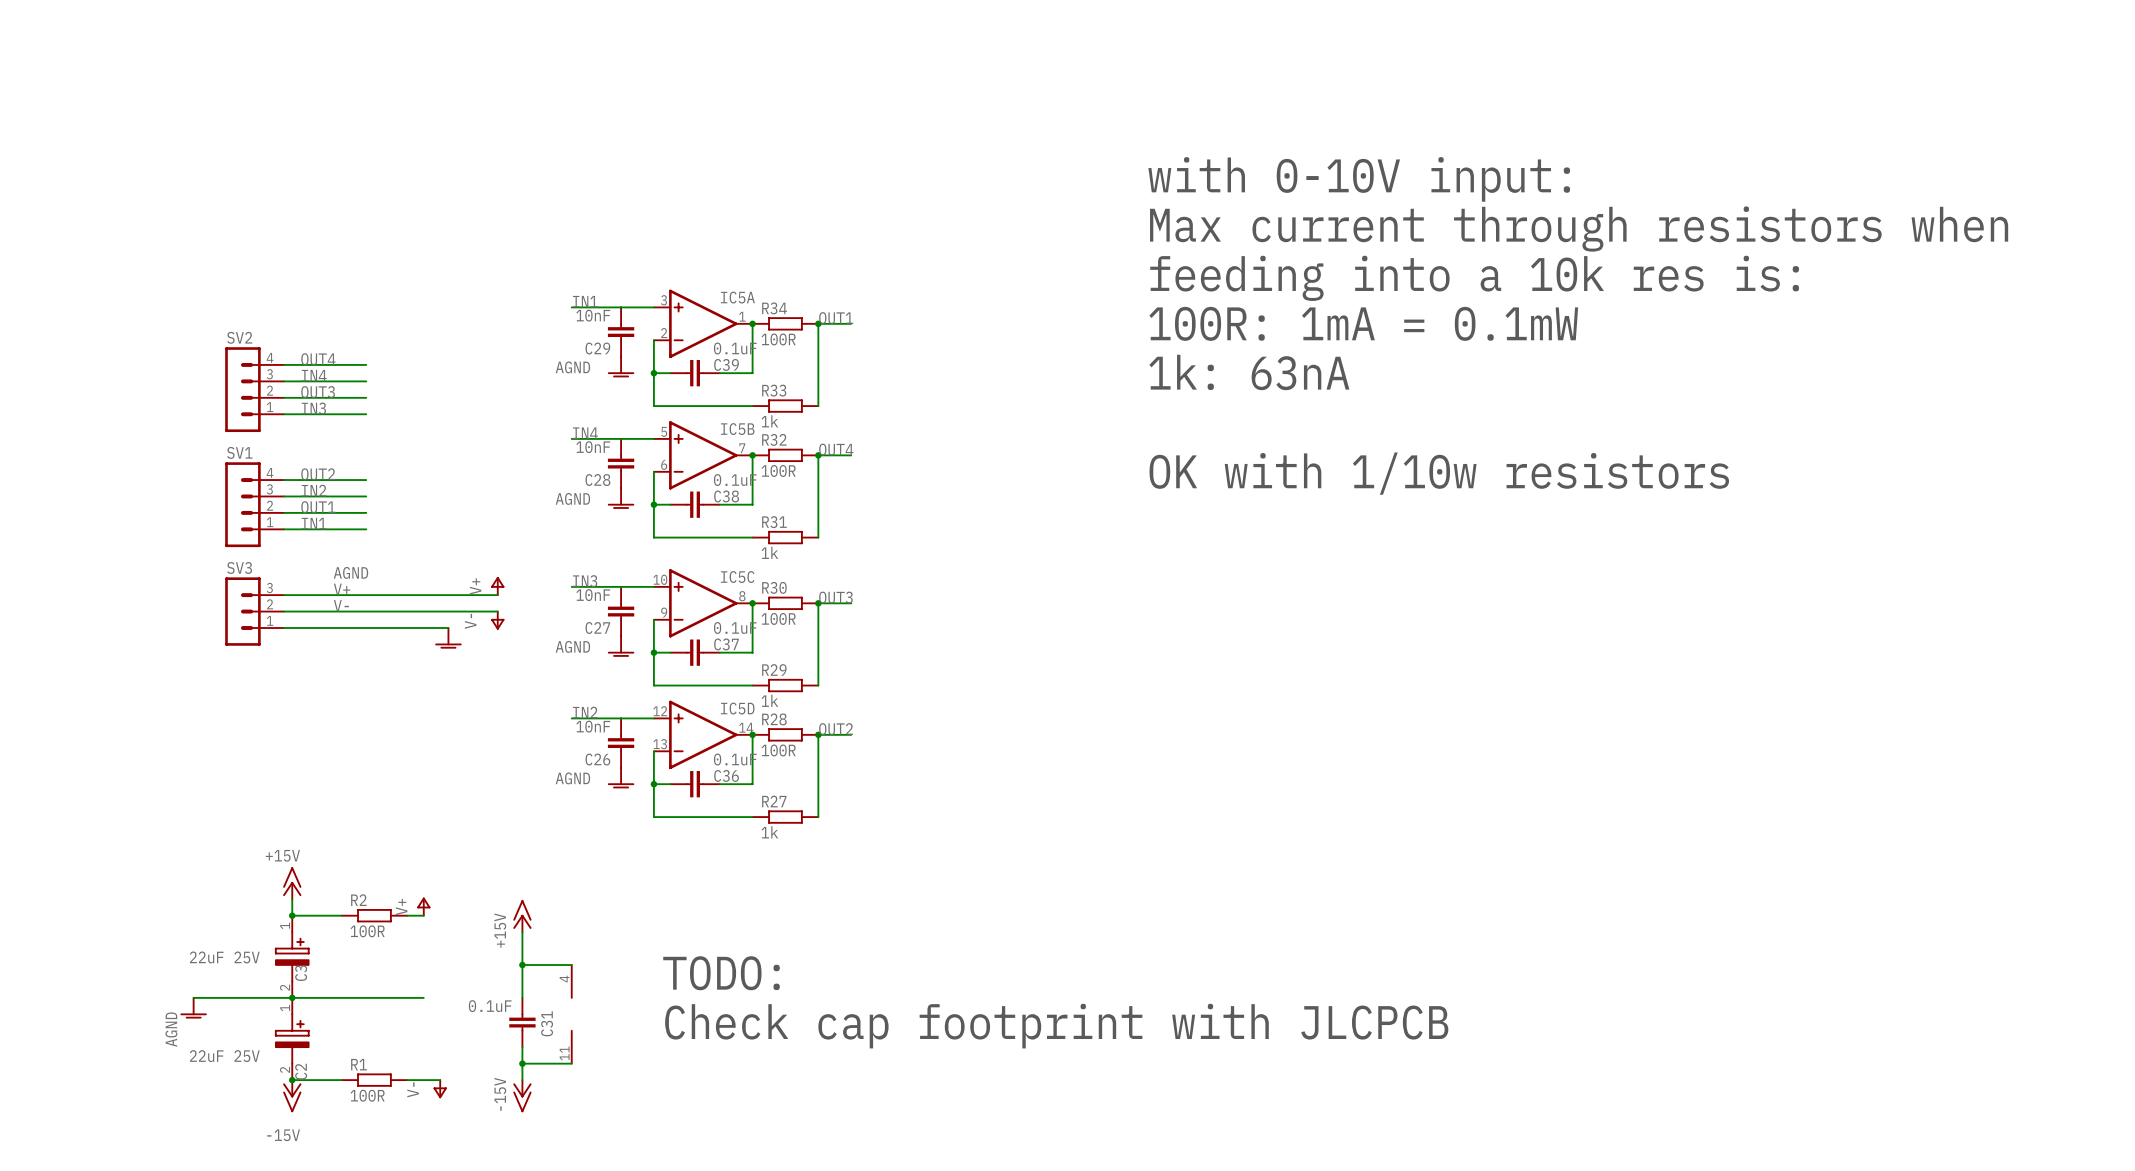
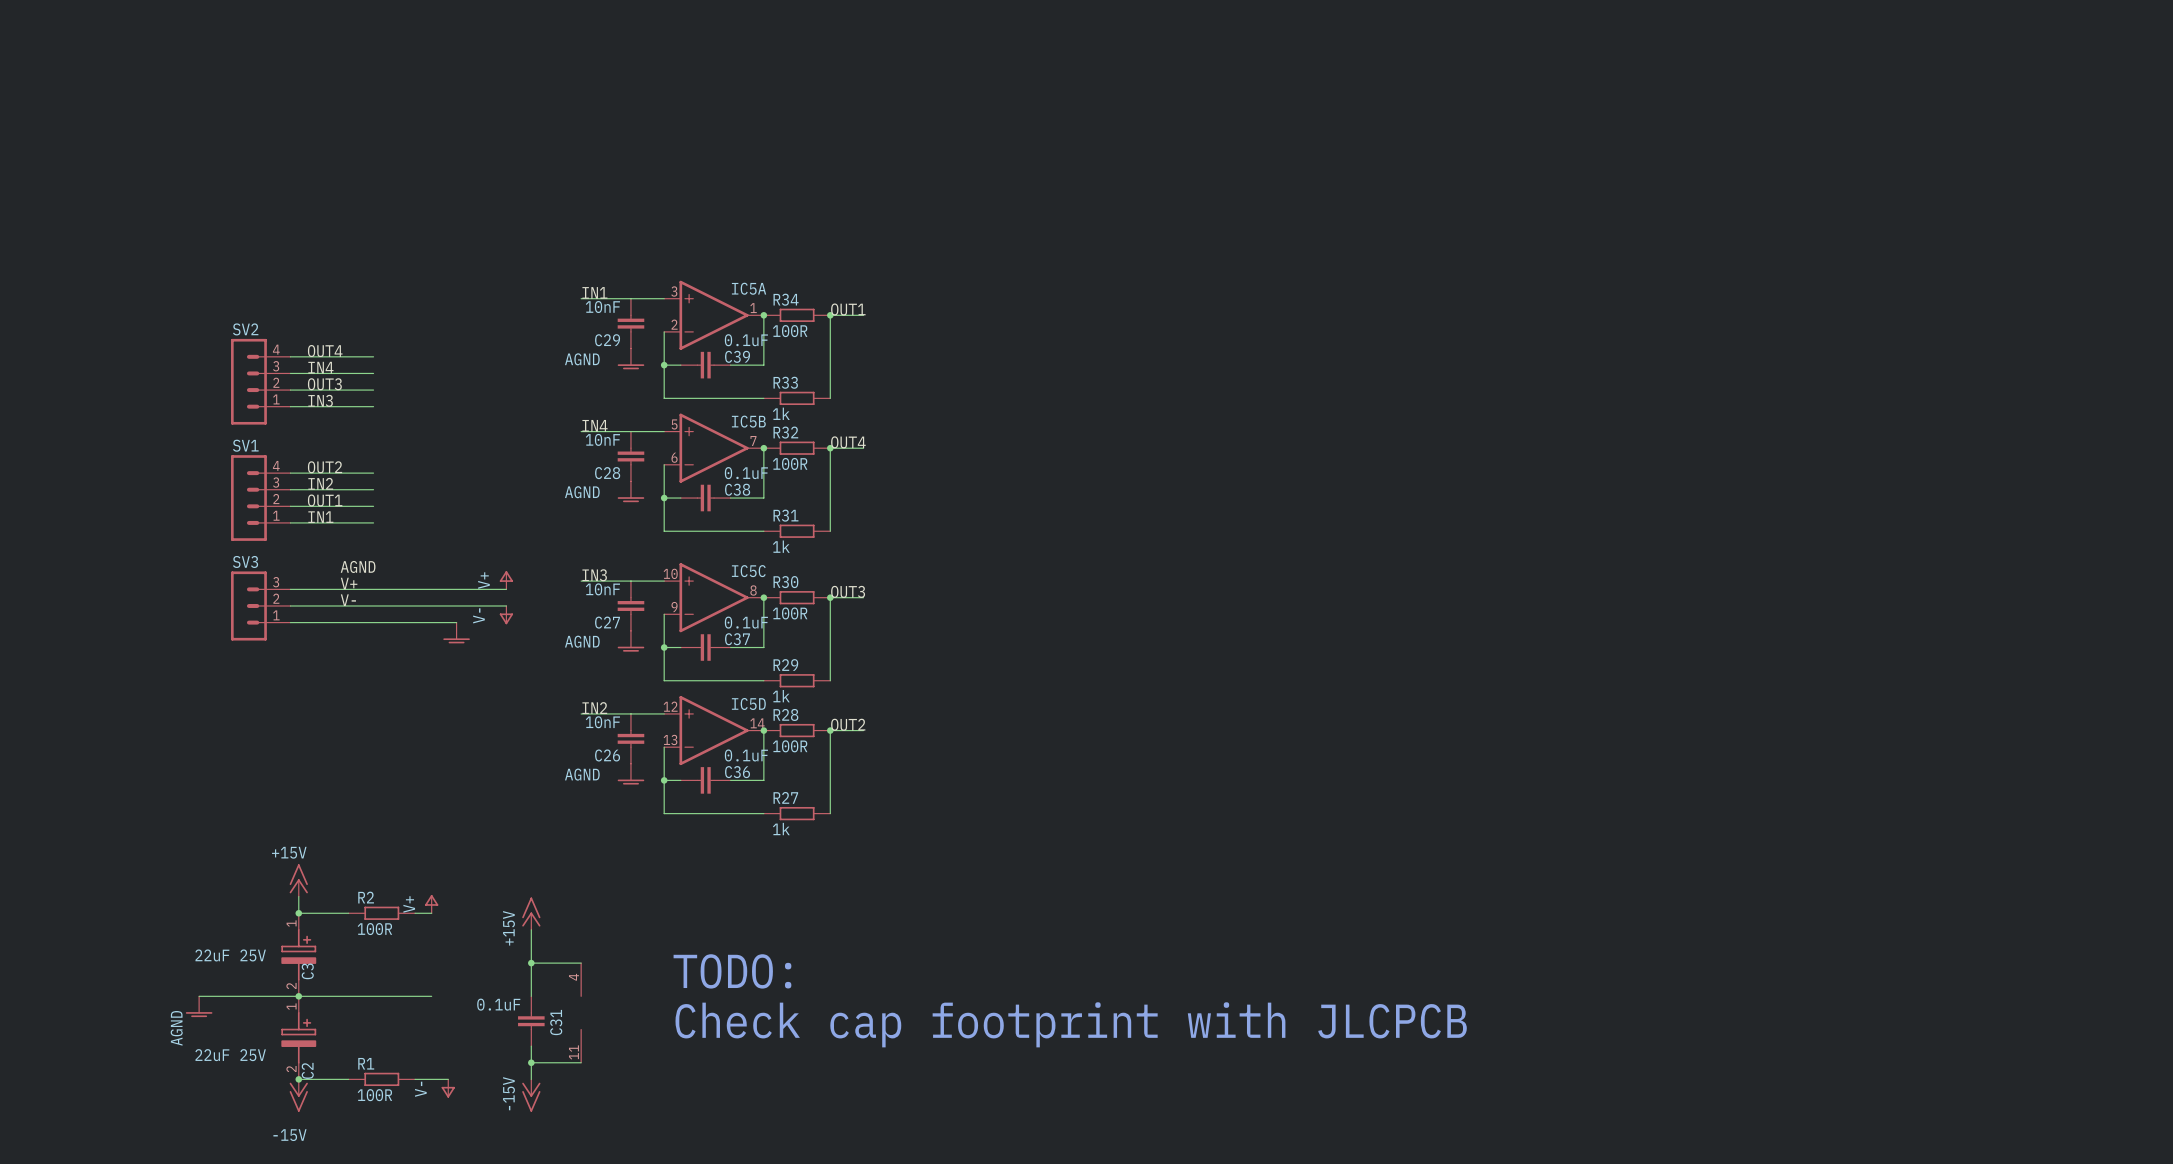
text: with 0-10V input: (1359, 179) -> none
text: Max current through resistors when (1579, 229) -> none
text: feeding into a 10k res is: (1474, 278) -> none
text: 100R: 1mA = 0.1mW (1363, 323) -> none
text: 1k: 63nA (1249, 372) -> none
text: OK with 1/10w resistors (1439, 473) -> none

